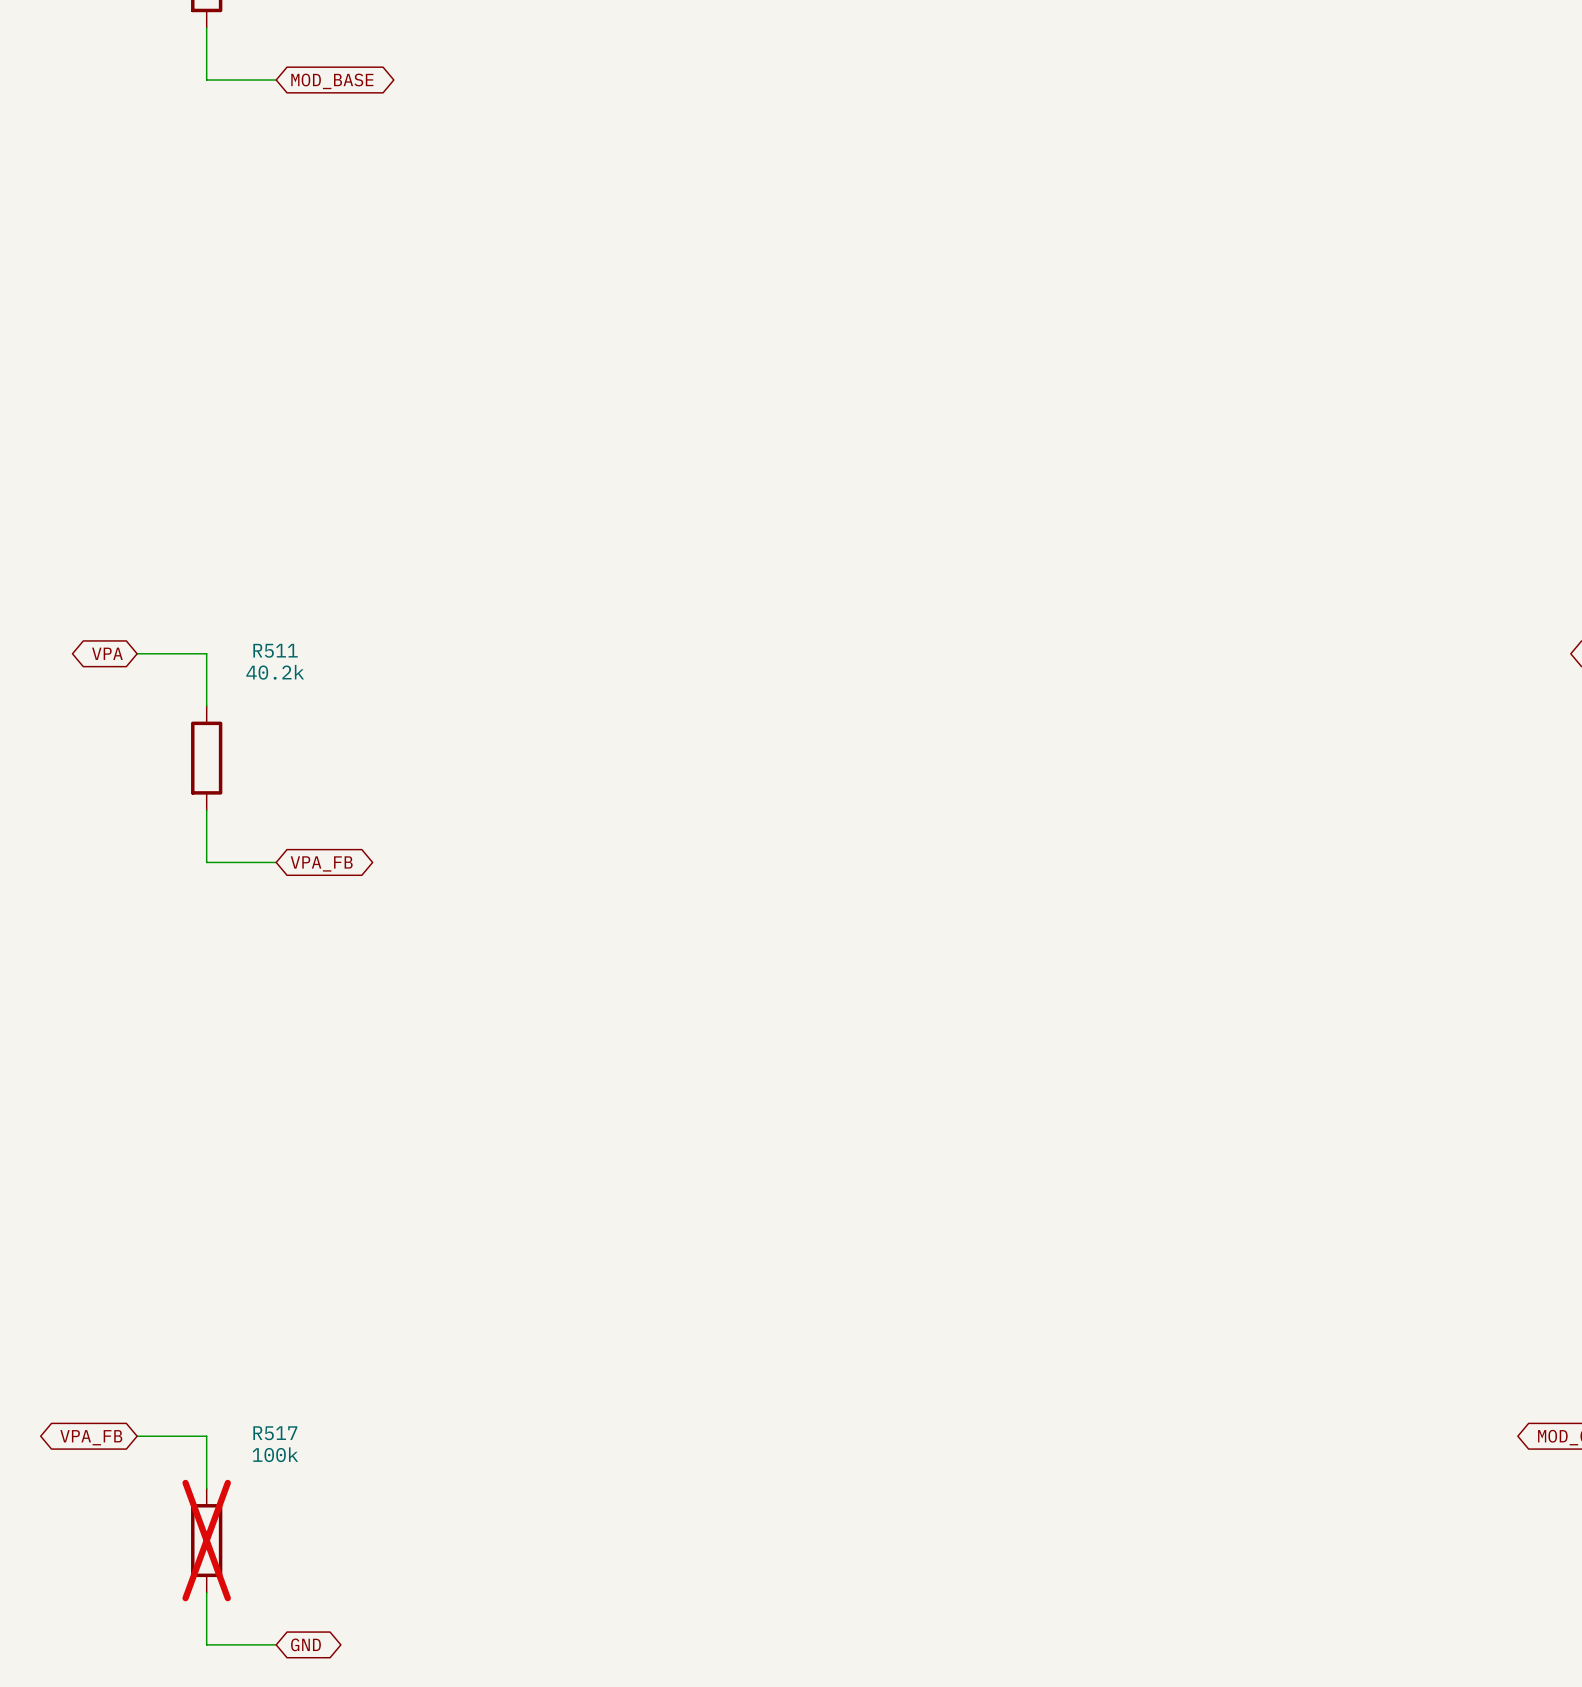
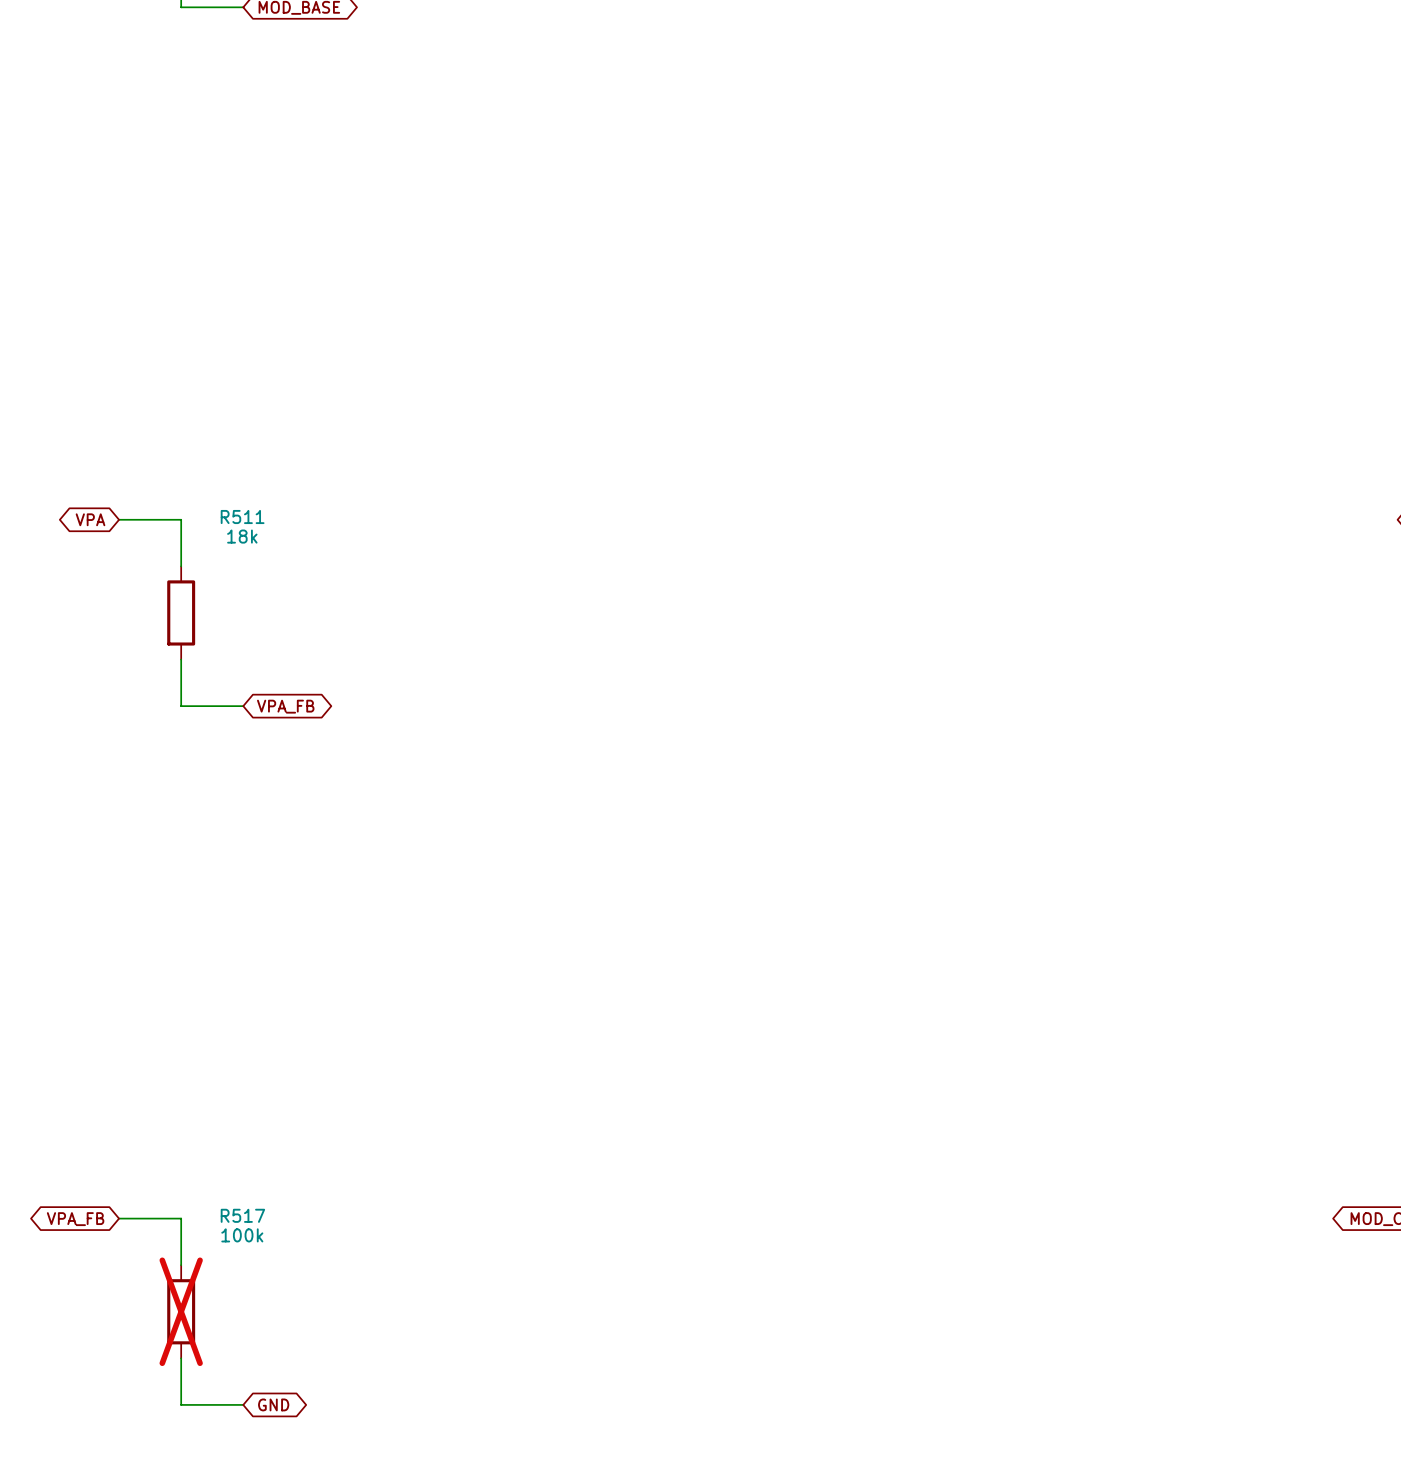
R511 value: 40.2k (275, 672) -> 18k (242, 536)

